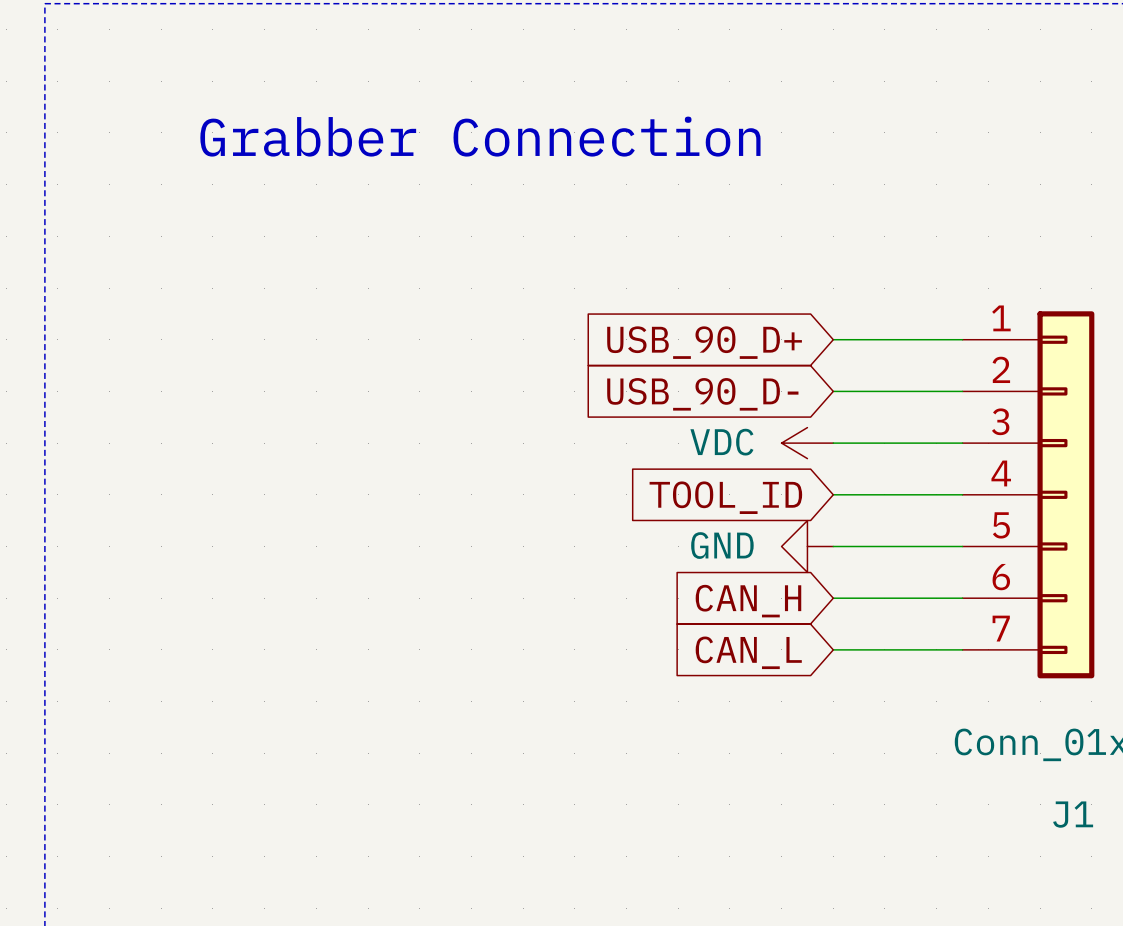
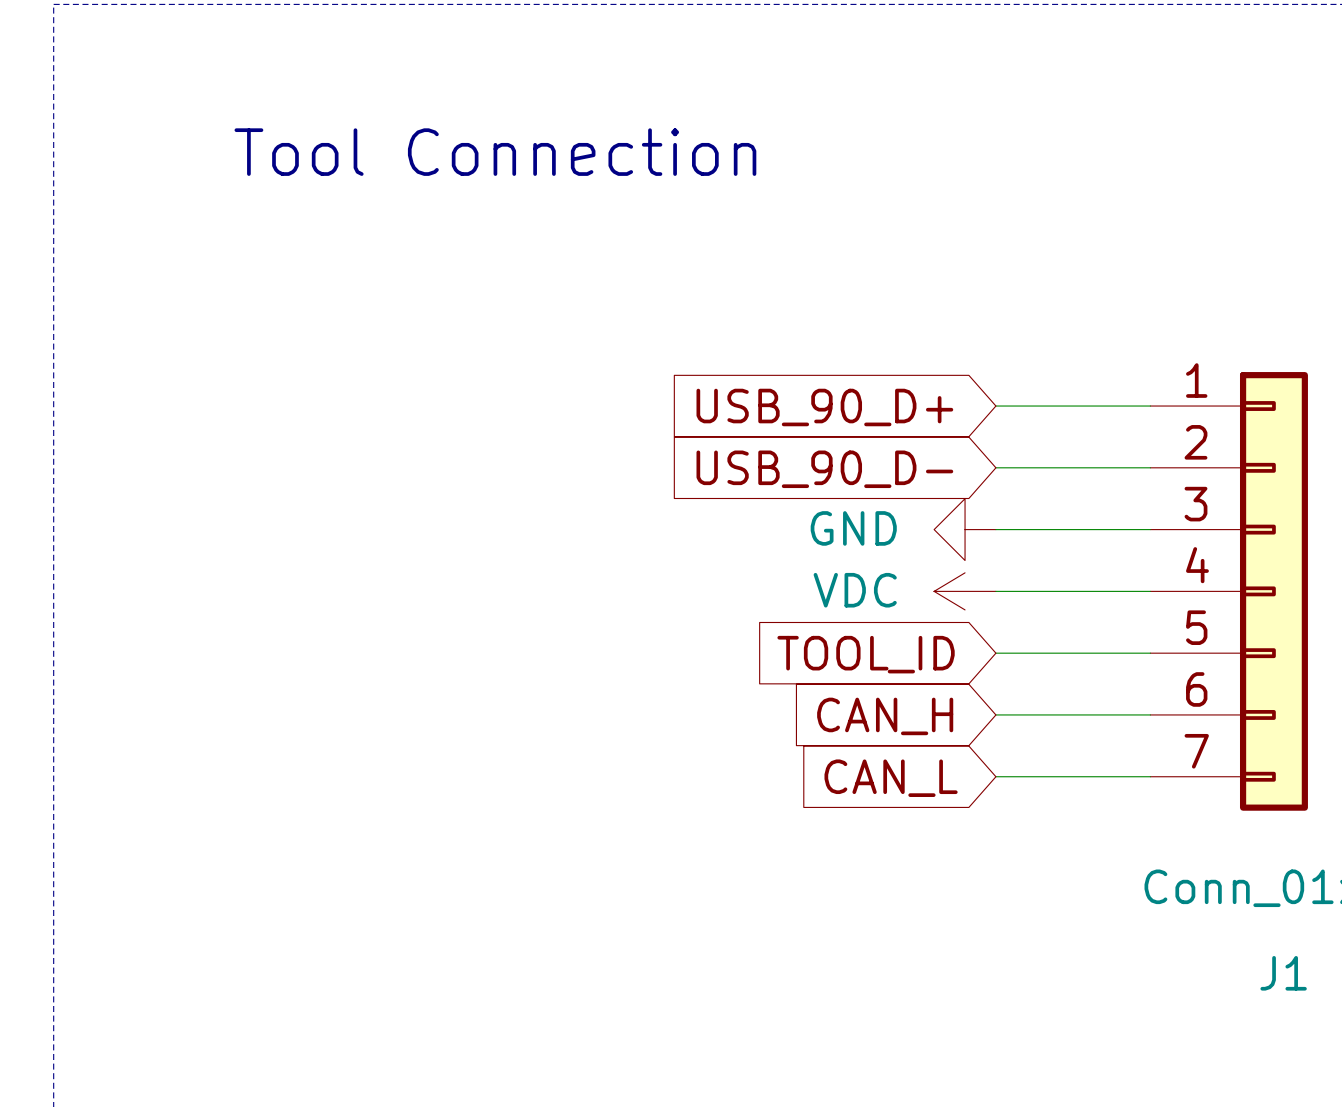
text: Grabber Connection (480, 136) -> Tool Connection (495, 152)
power symbol: VDC (807, 443) -> GND (965, 529)
power symbol: none -> VDC (965, 591)
global label position: TOOL_ID (725, 497) -> TOOL_ID (866, 654)
power symbol: GND (807, 546) -> none

